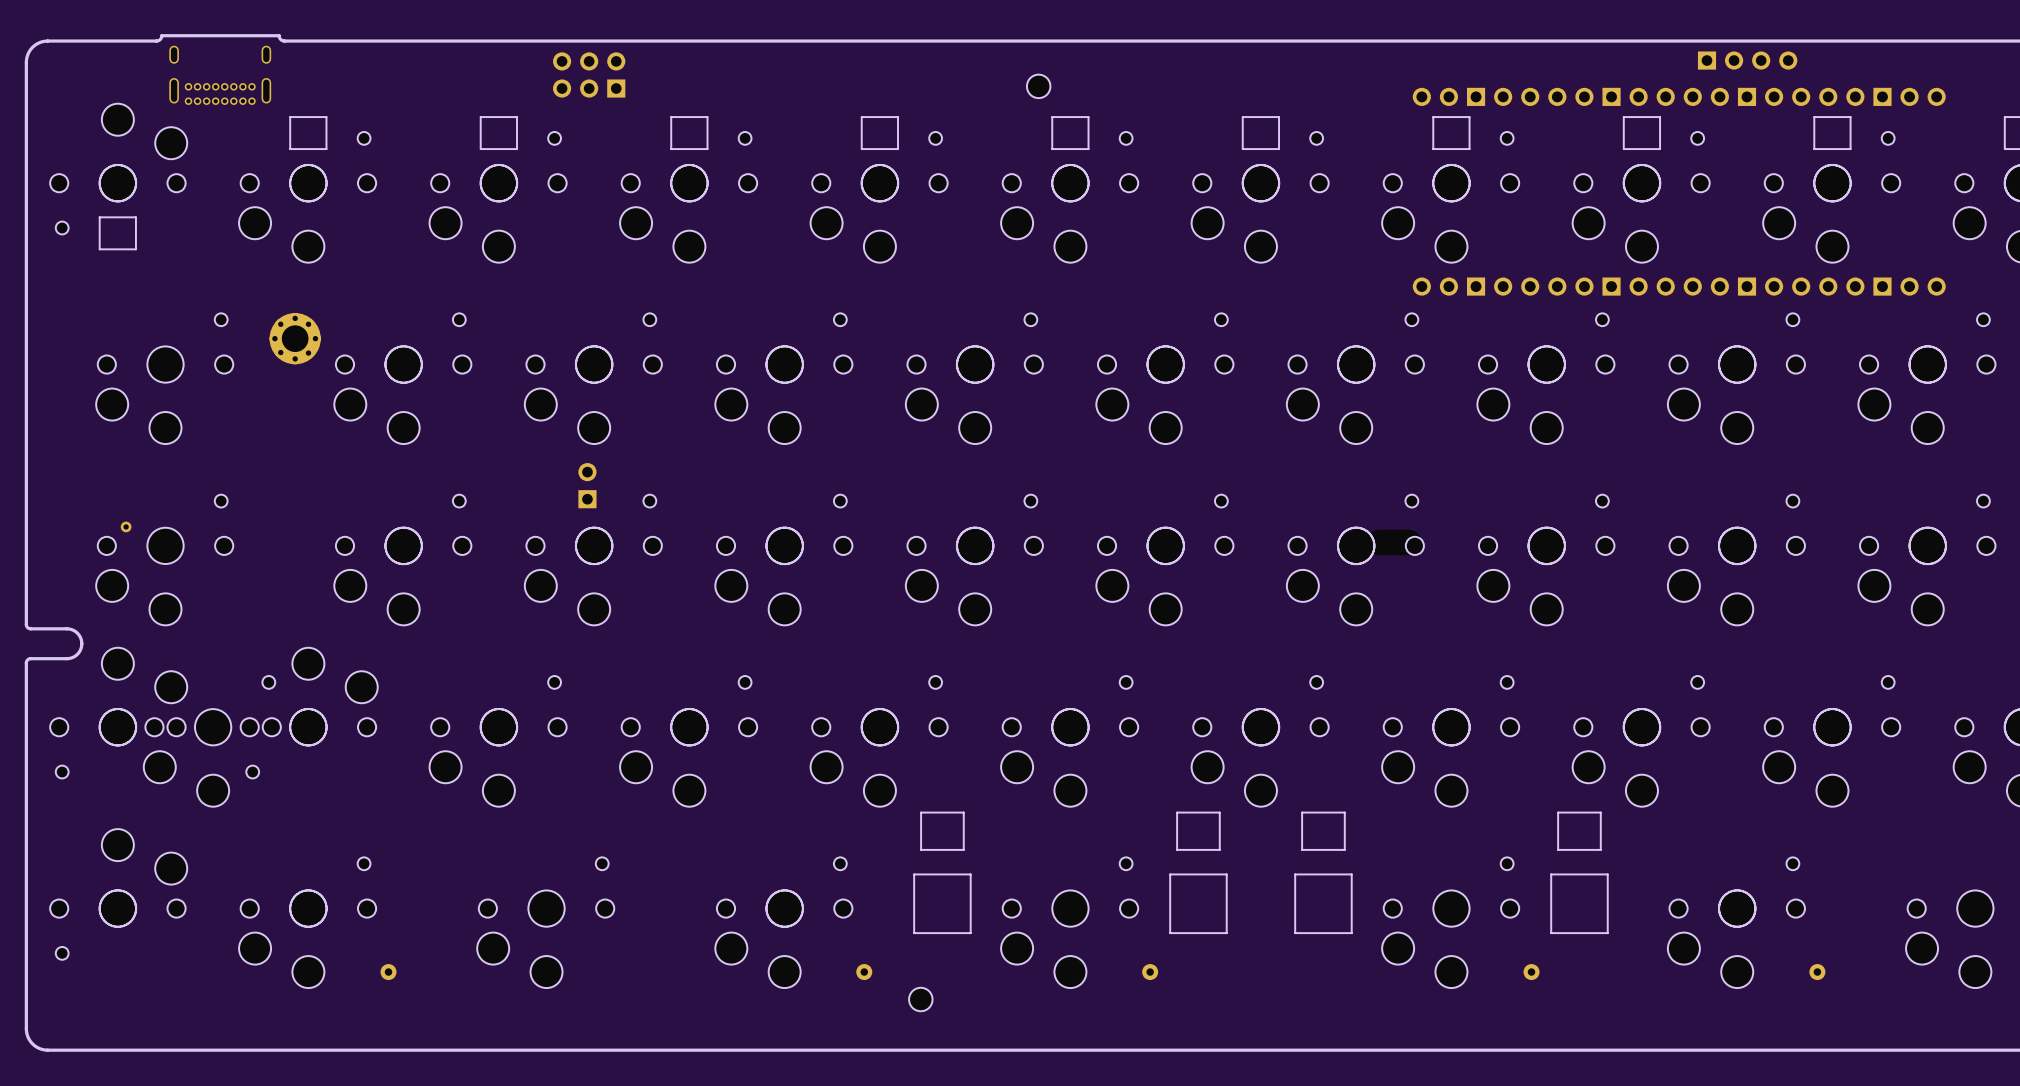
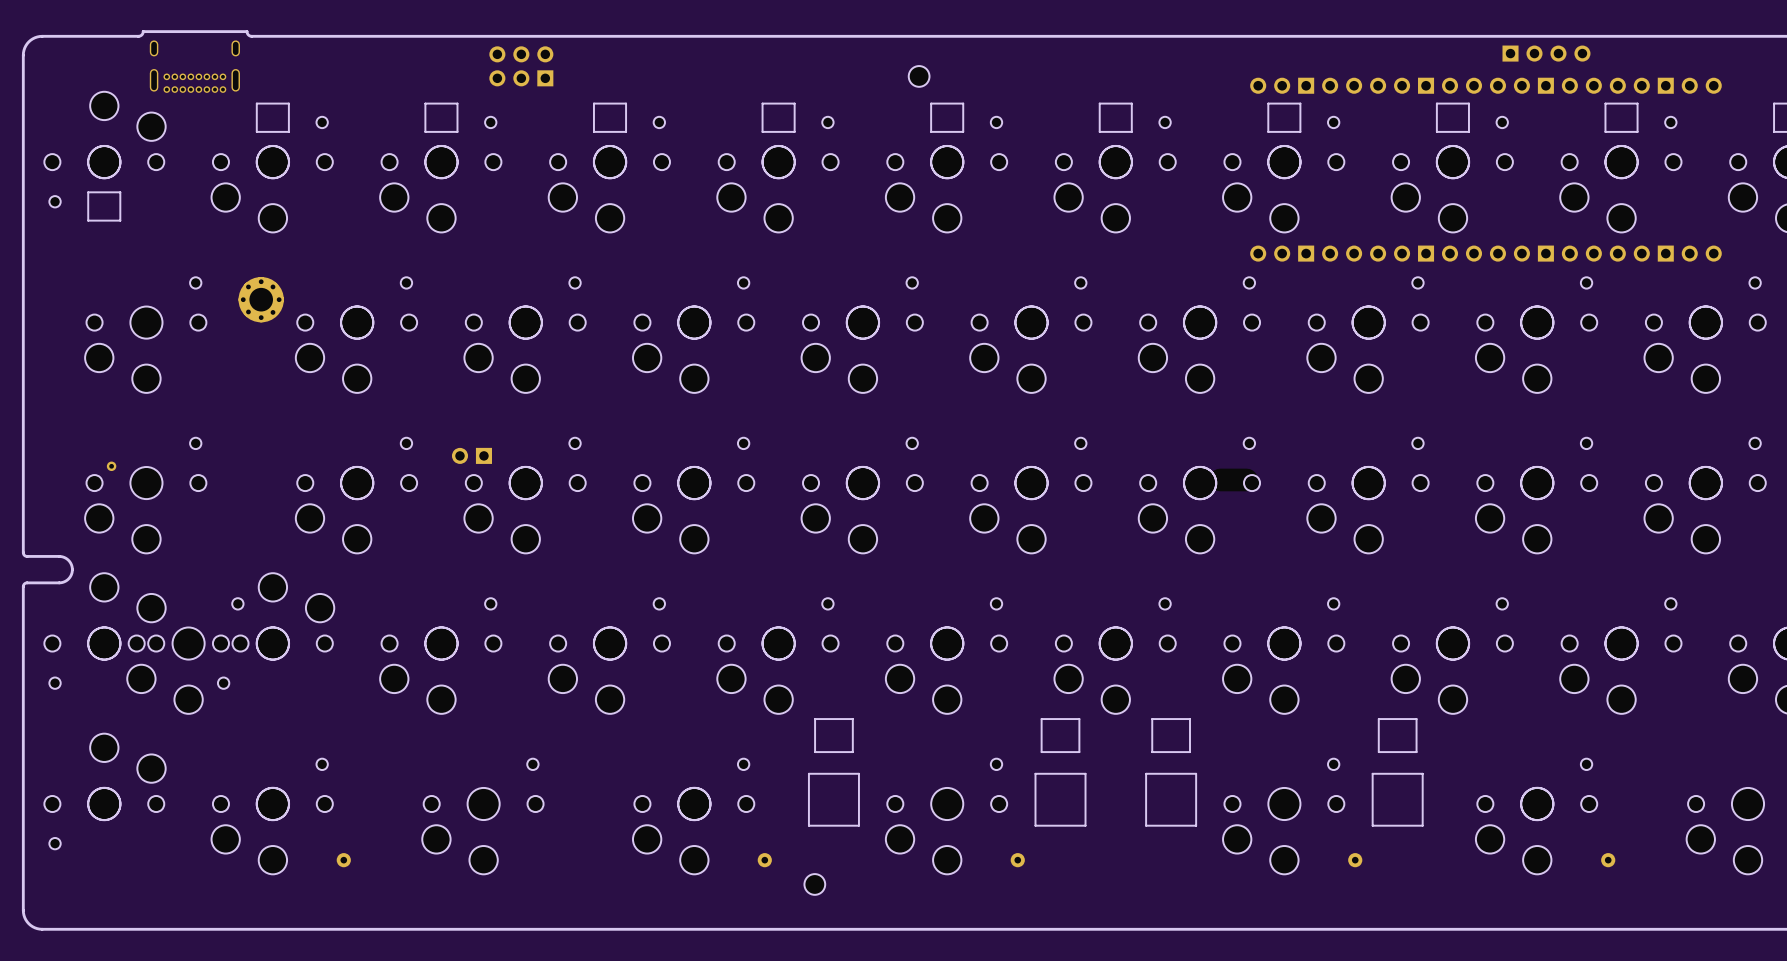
part rotation: 0° (587, 485) -> 90° counterclockwise (471, 455)
part position: (587, 485) -> (471, 455)

